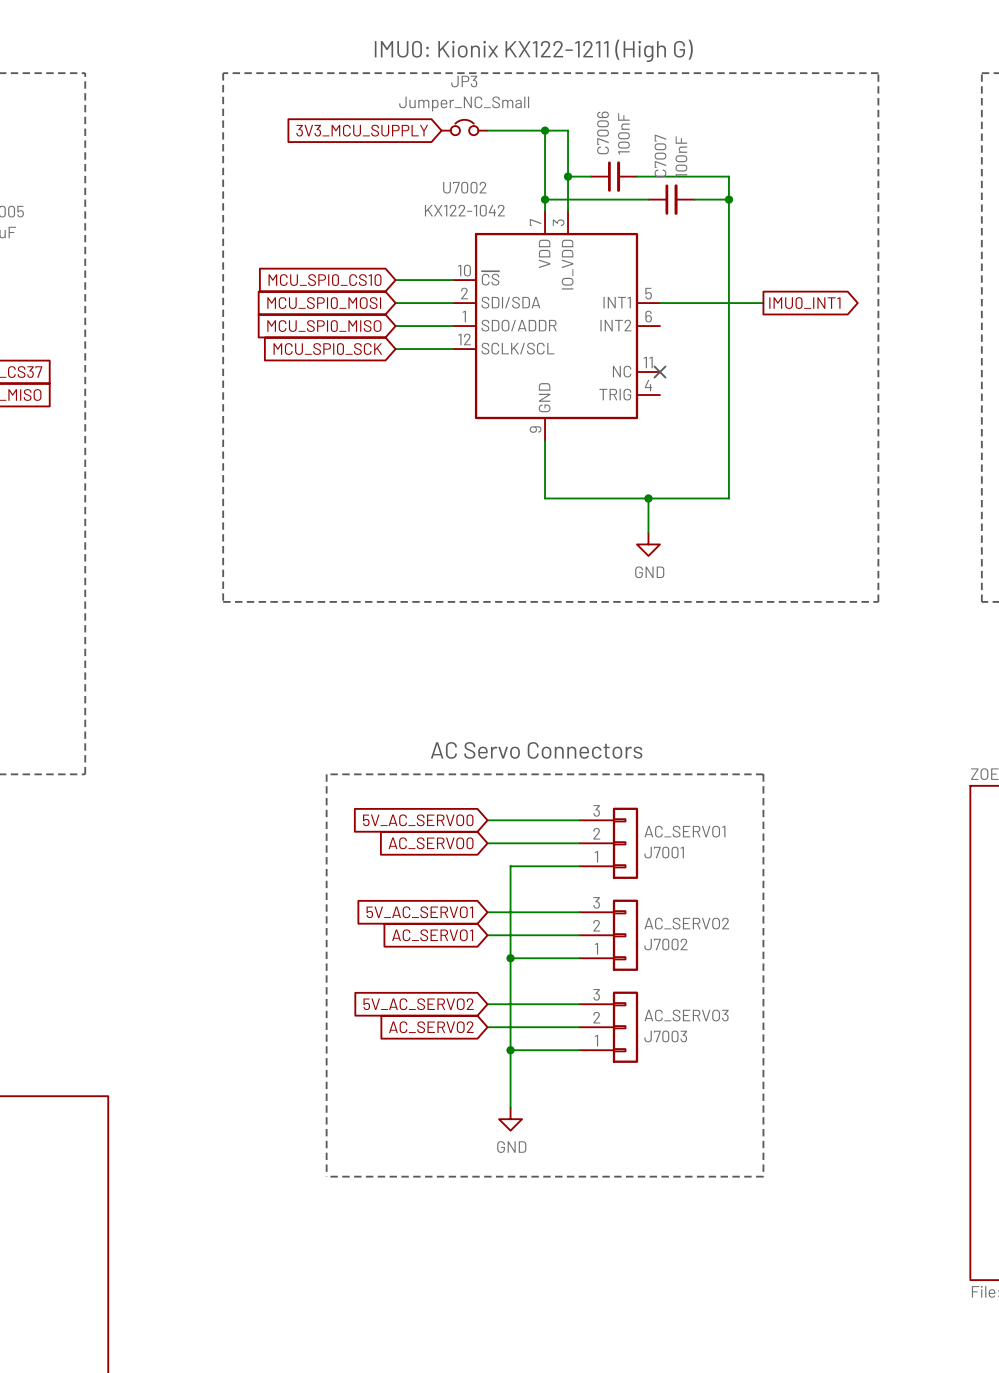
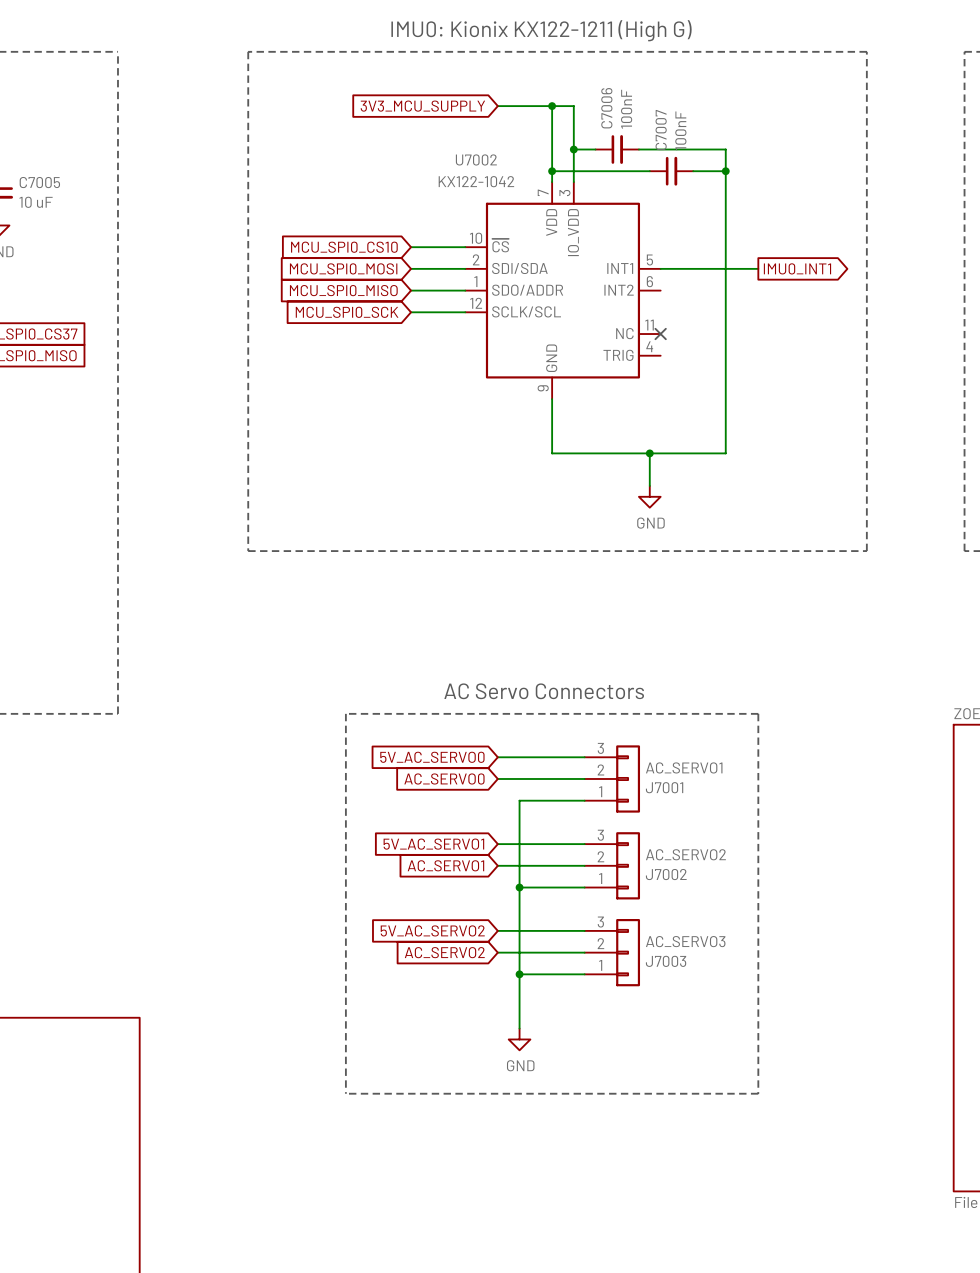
JP3: Jumper_NC_Small (464, 127) -> none
global label position: 3V3_MCU_SUPPLY (362, 130) -> 3V3_MCU_SUPPLY (422, 106)

